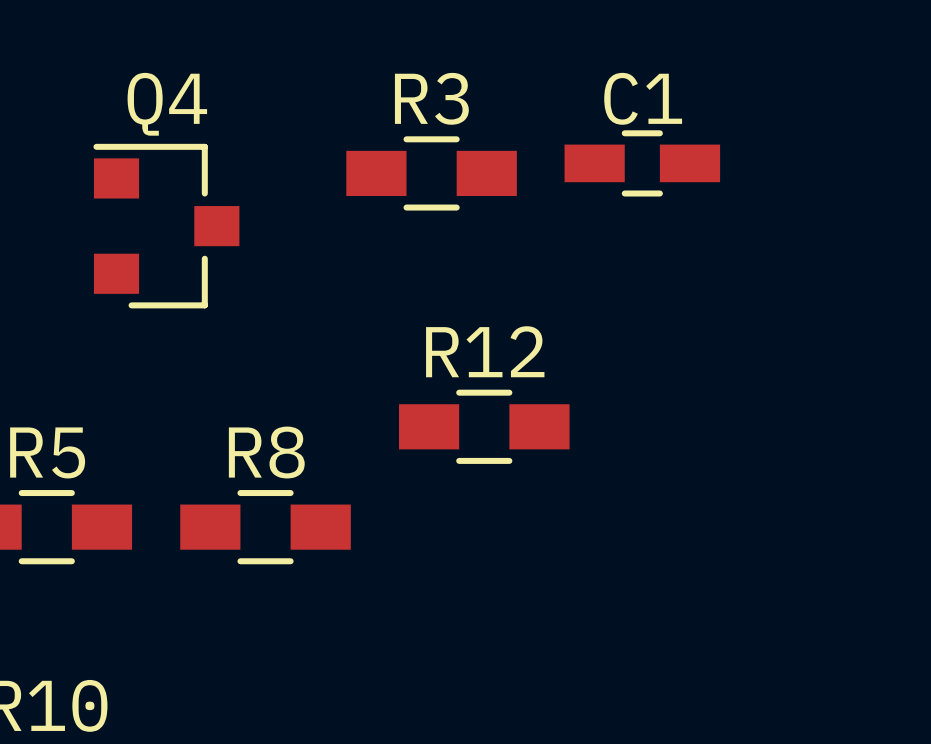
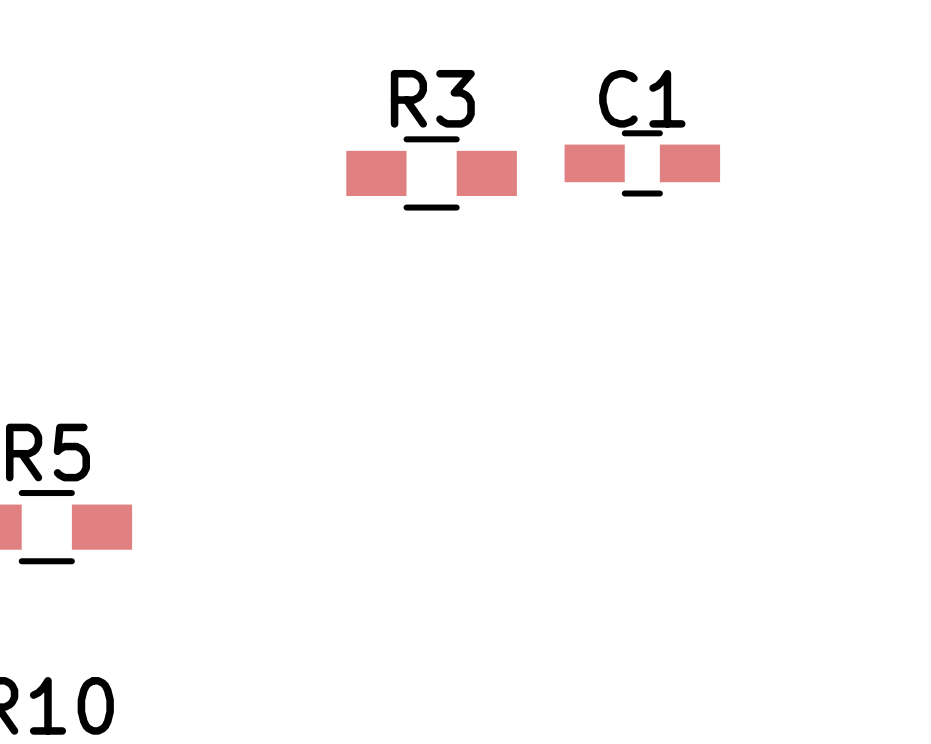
Q4: (166, 226) -> none
R12: (484, 426) -> none
R8: (265, 527) -> none

